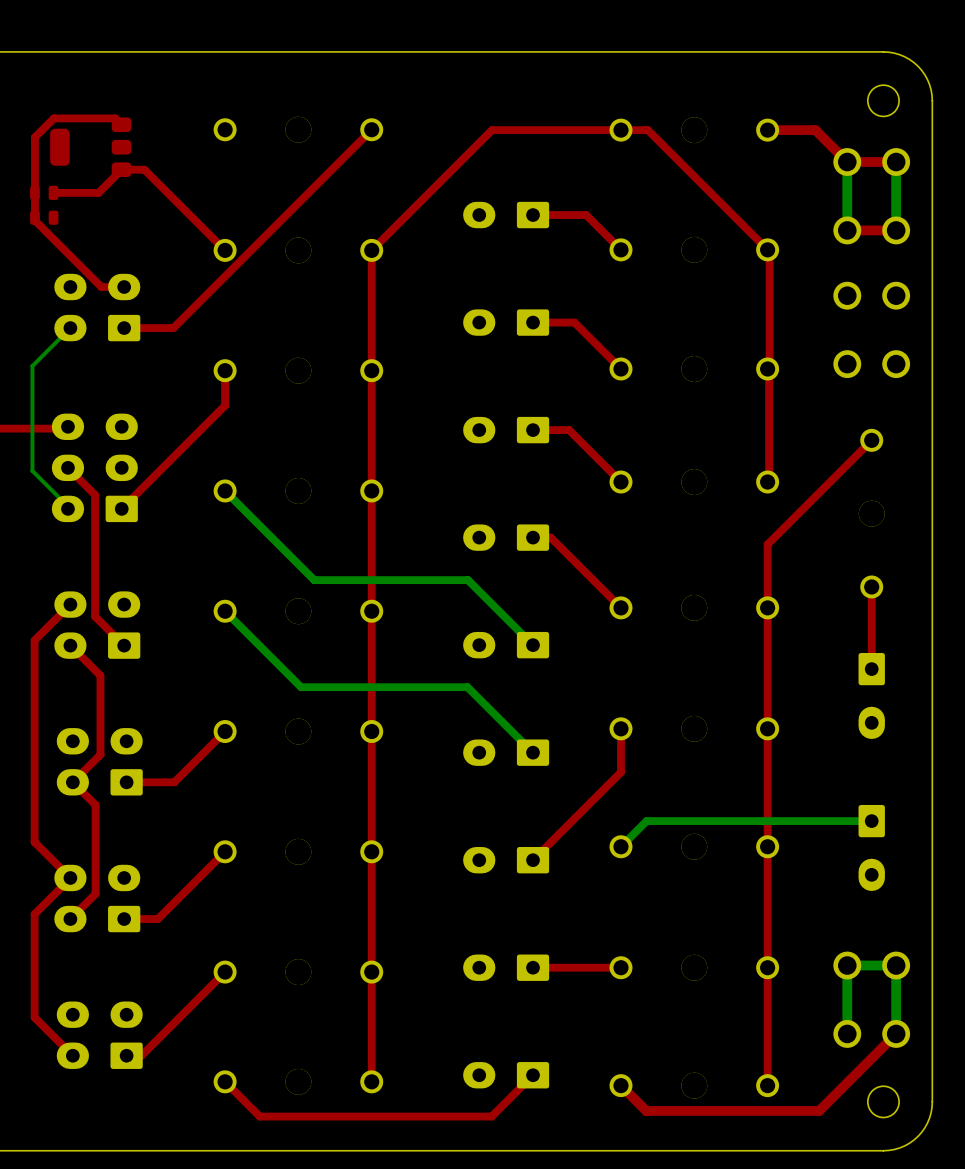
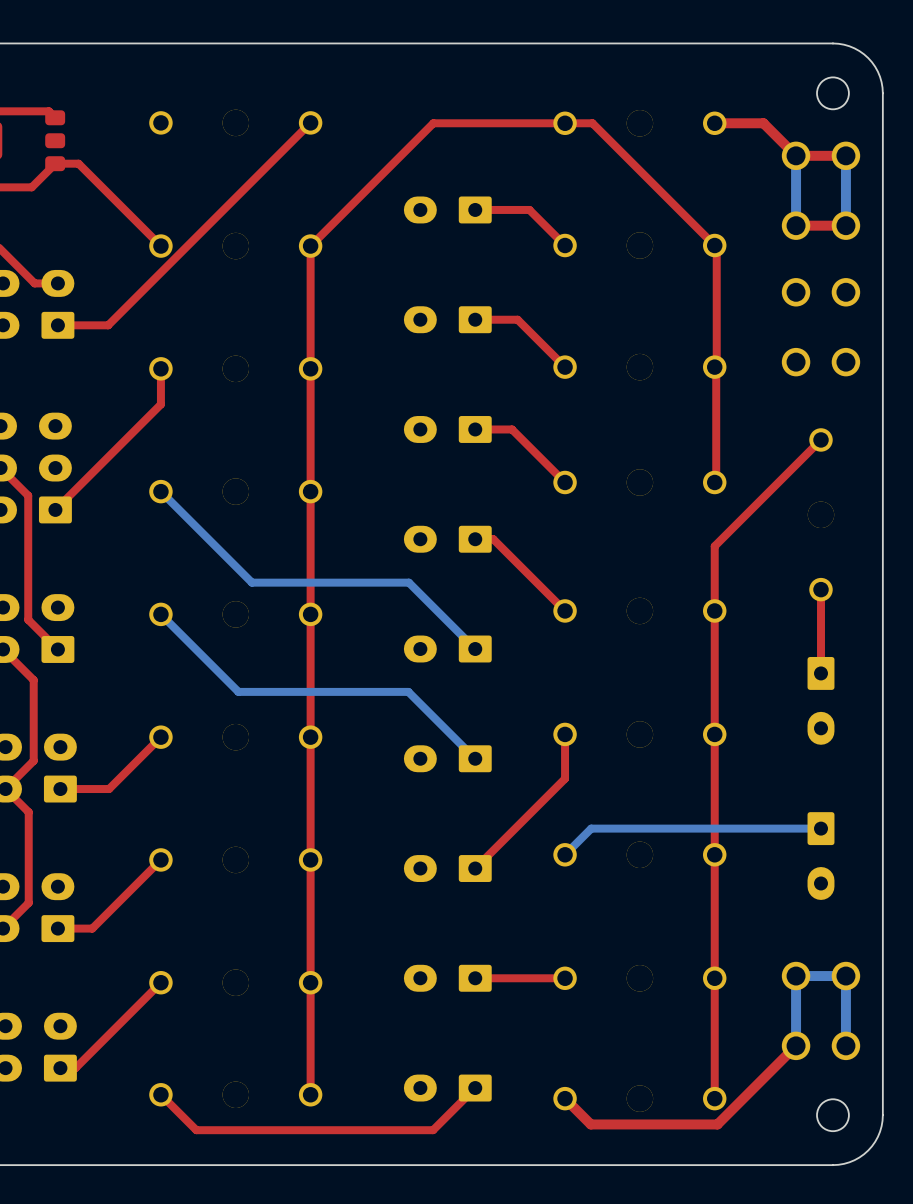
top track: (896, 1033) (819, 1110) (770, 1110) -> (796, 1045) (717, 1124)

